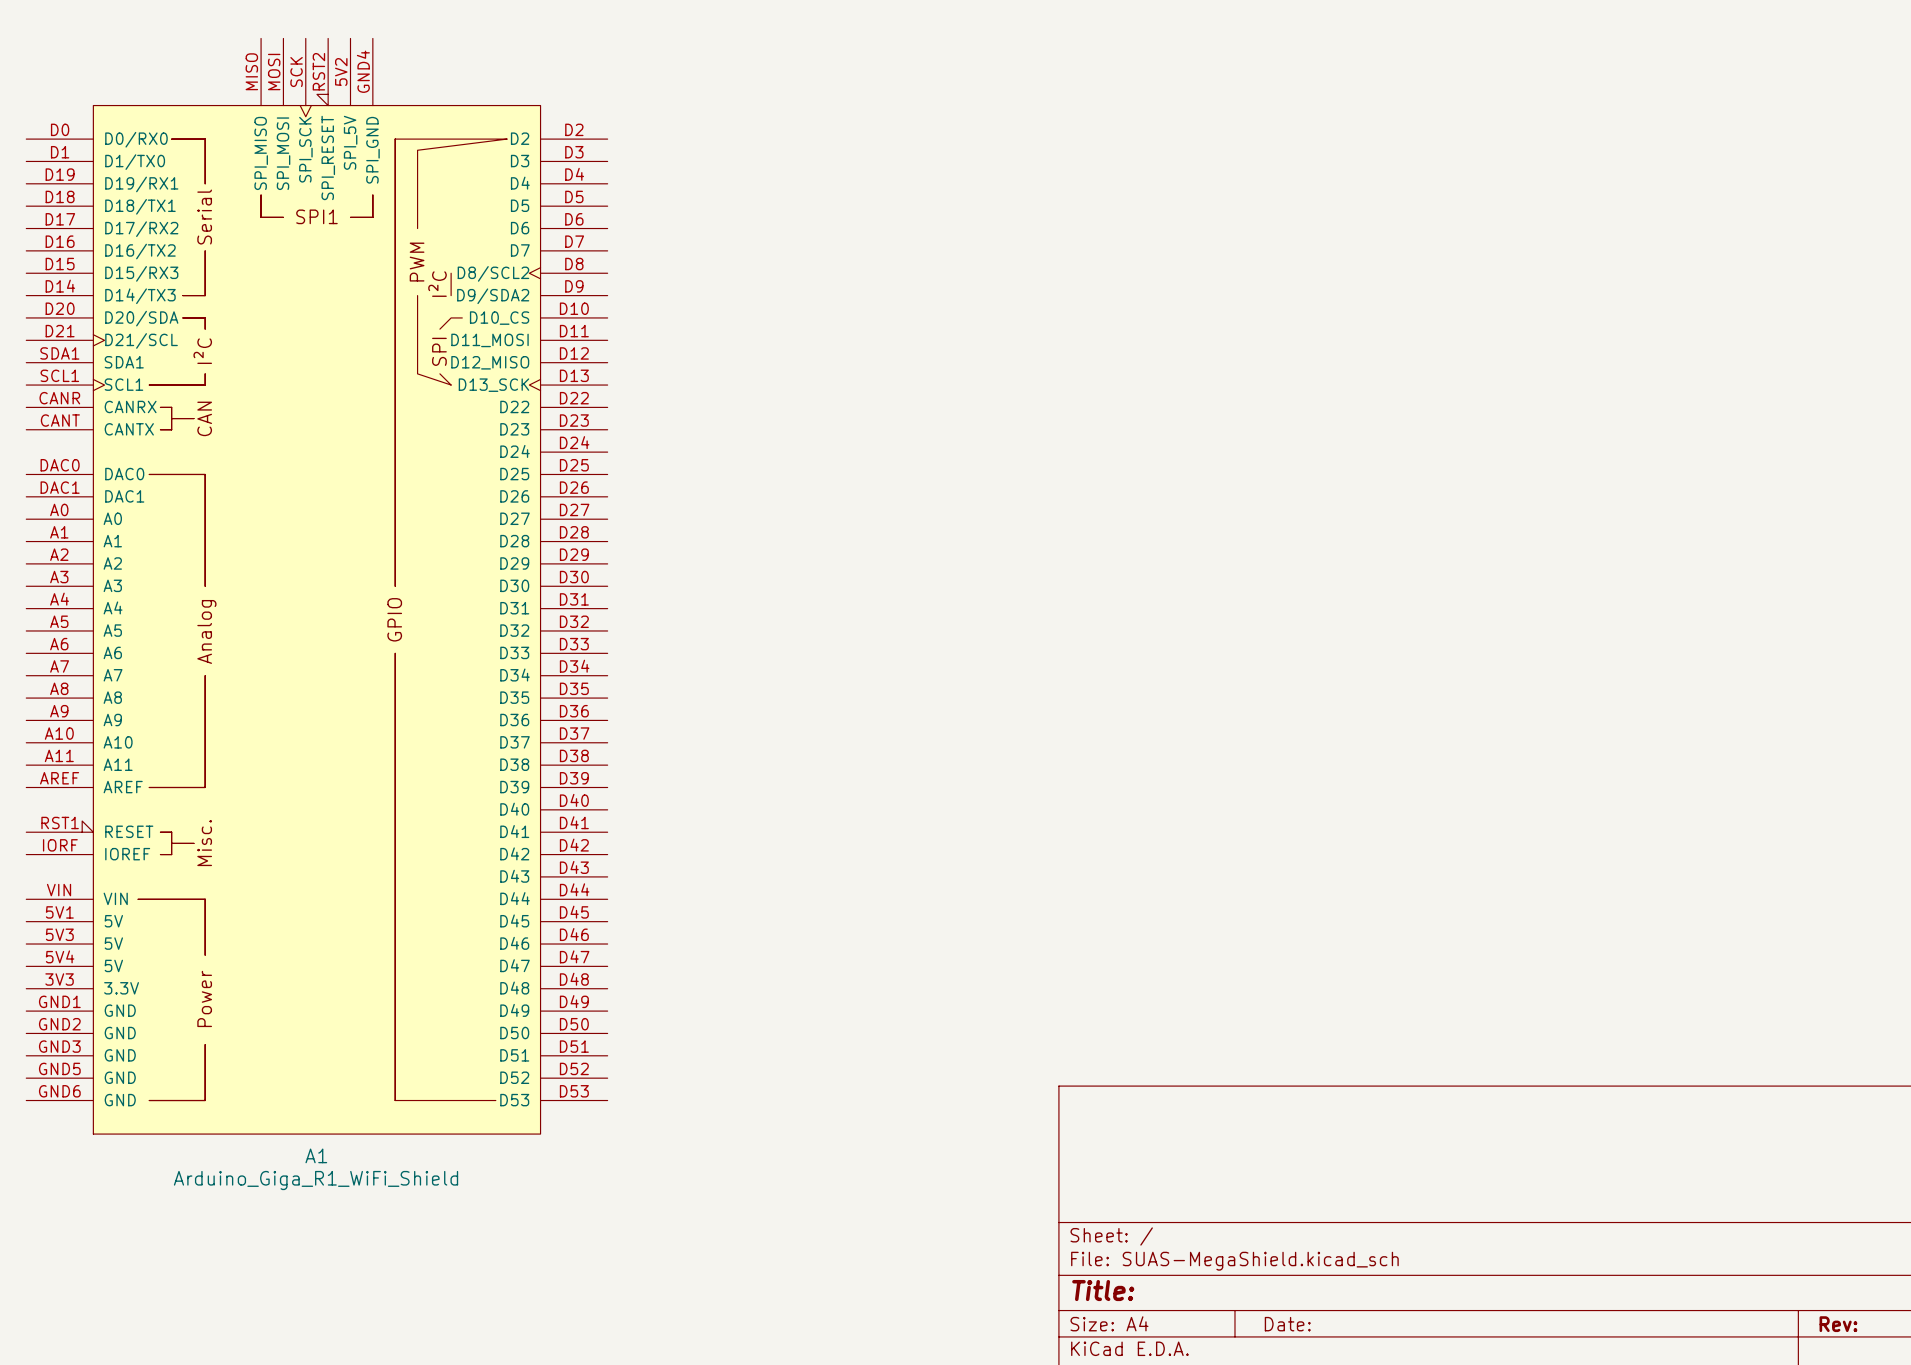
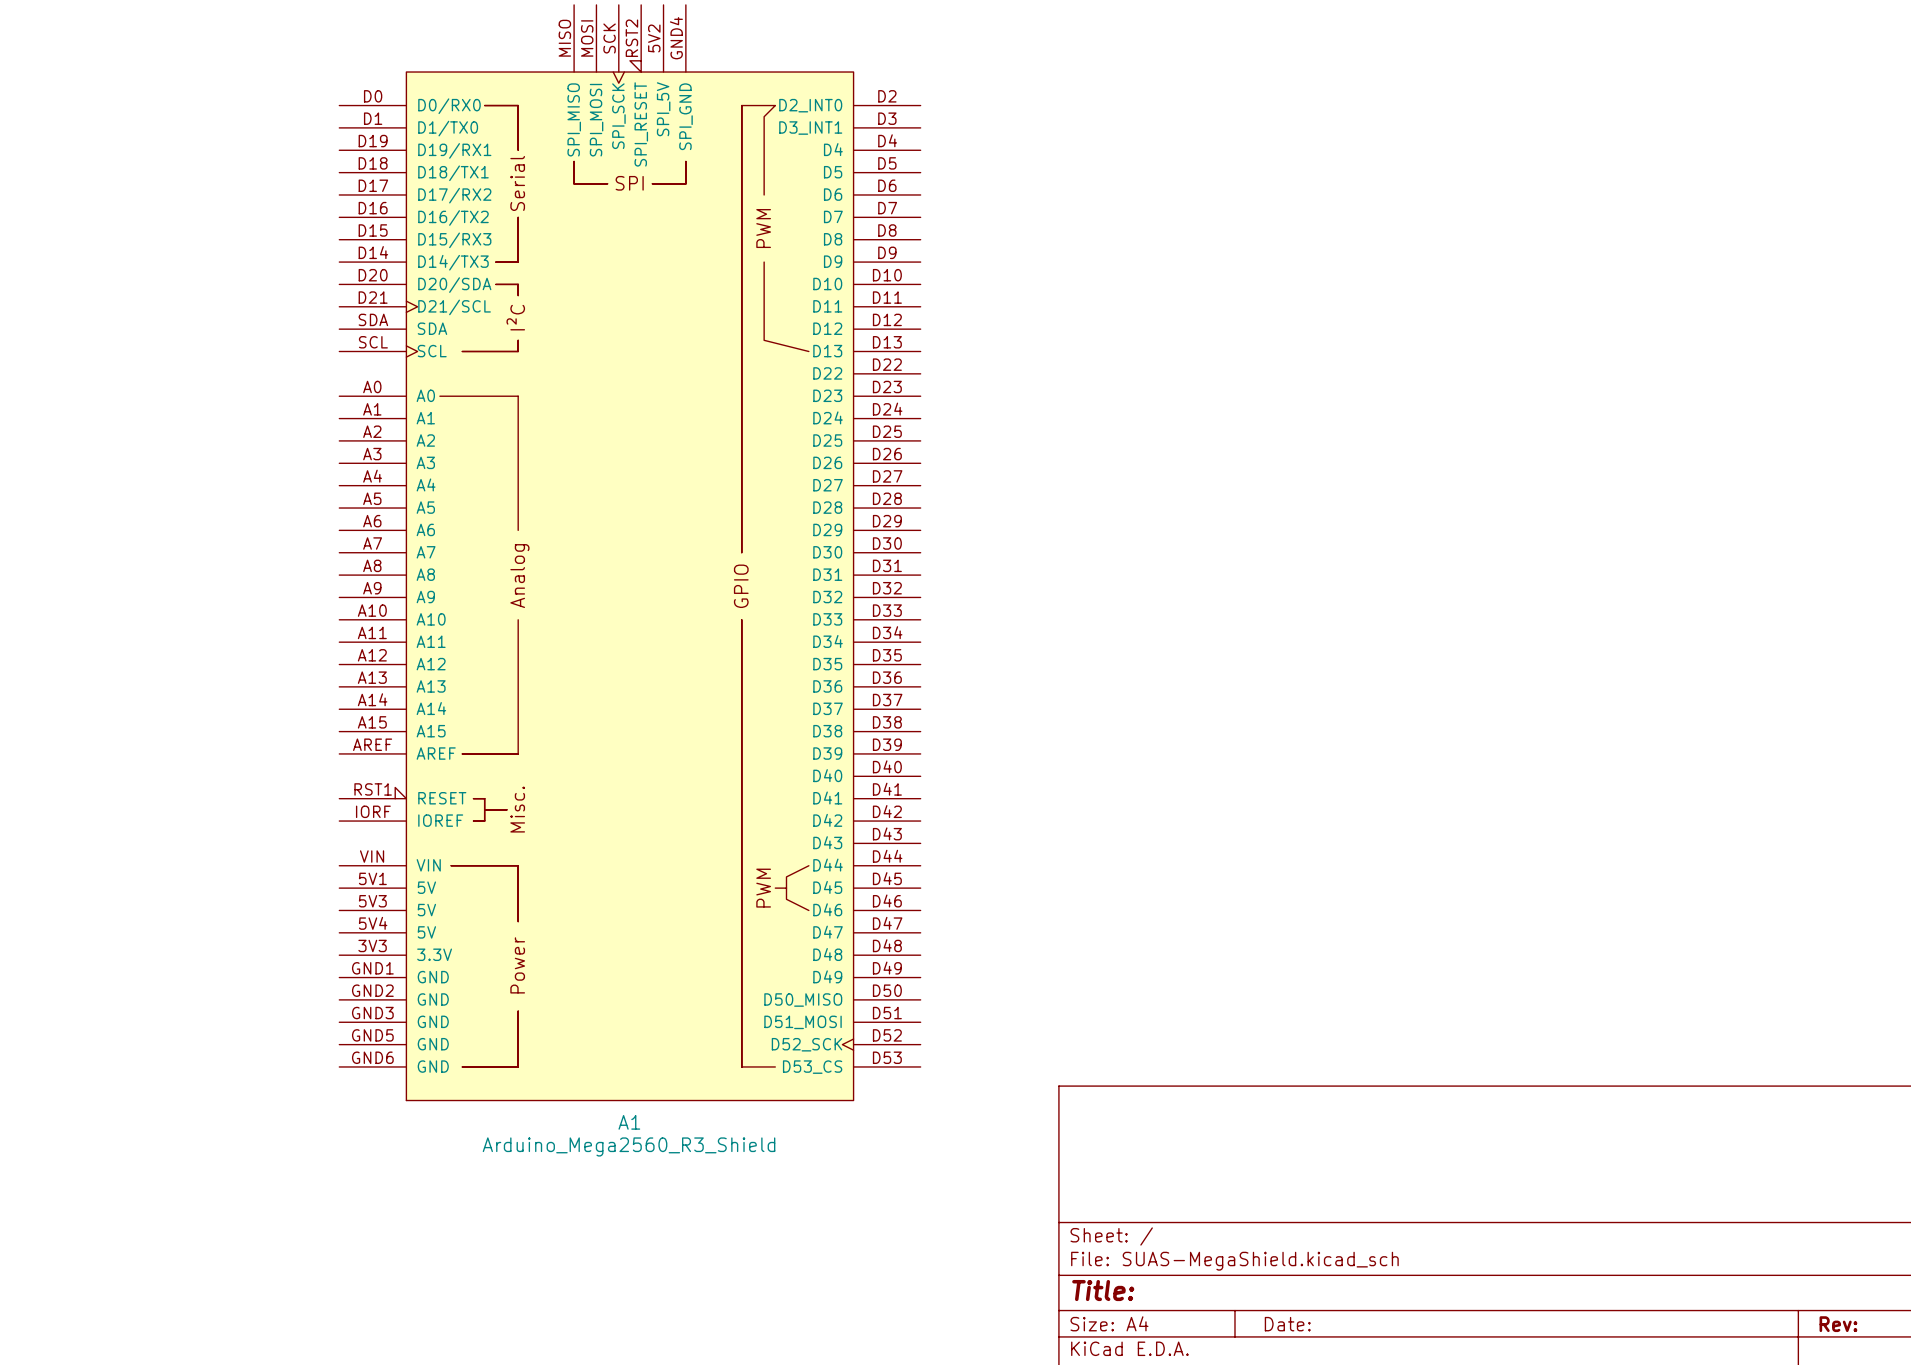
A1 symbol: [26, 38, 608, 1135] -> [339, 4, 921, 1101]
A1 value: Arduino_Giga_R1_WiFi_Shield (316, 1180) -> Arduino_Mega2560_R3_Shield (629, 1146)

